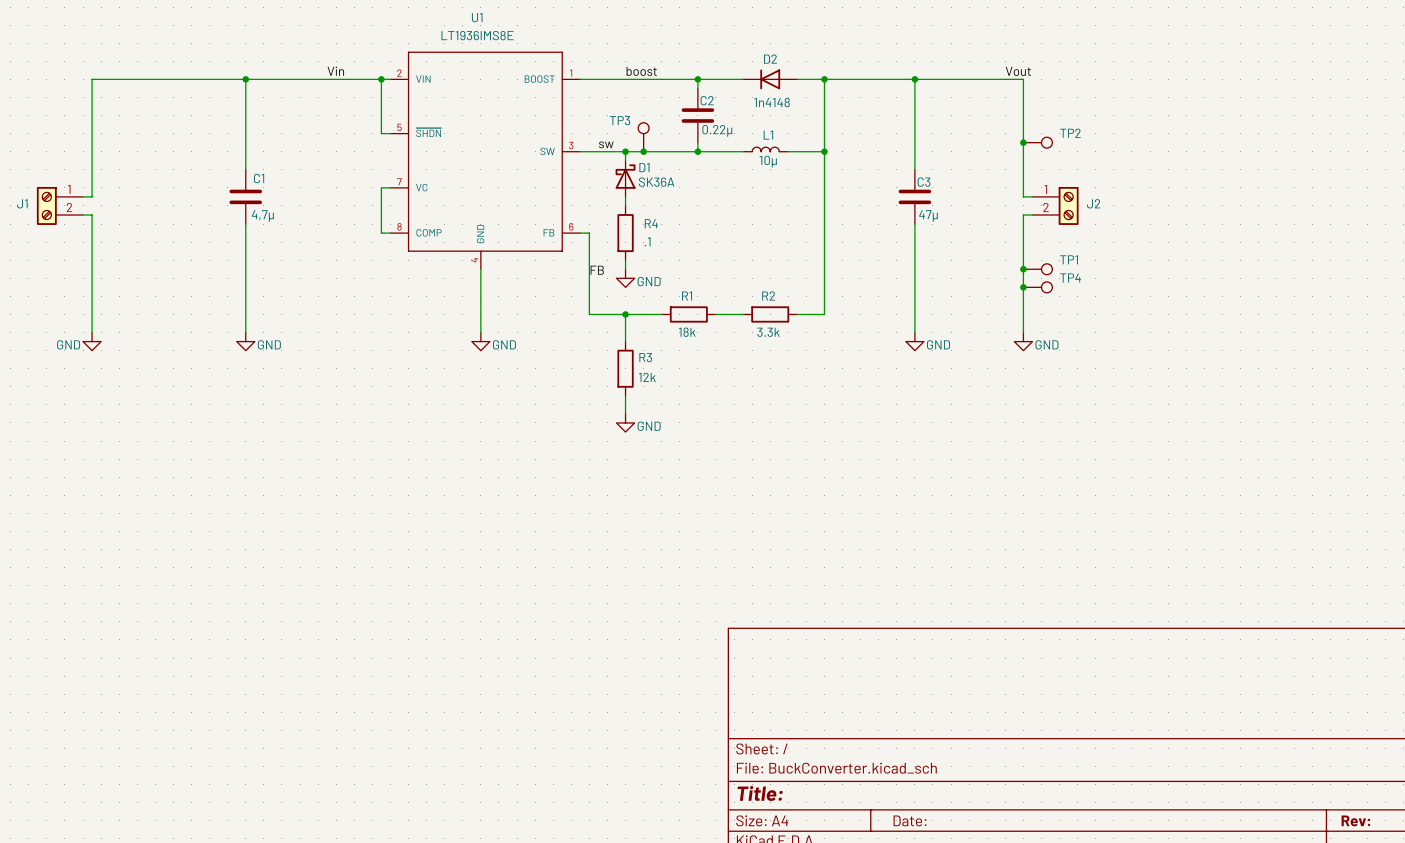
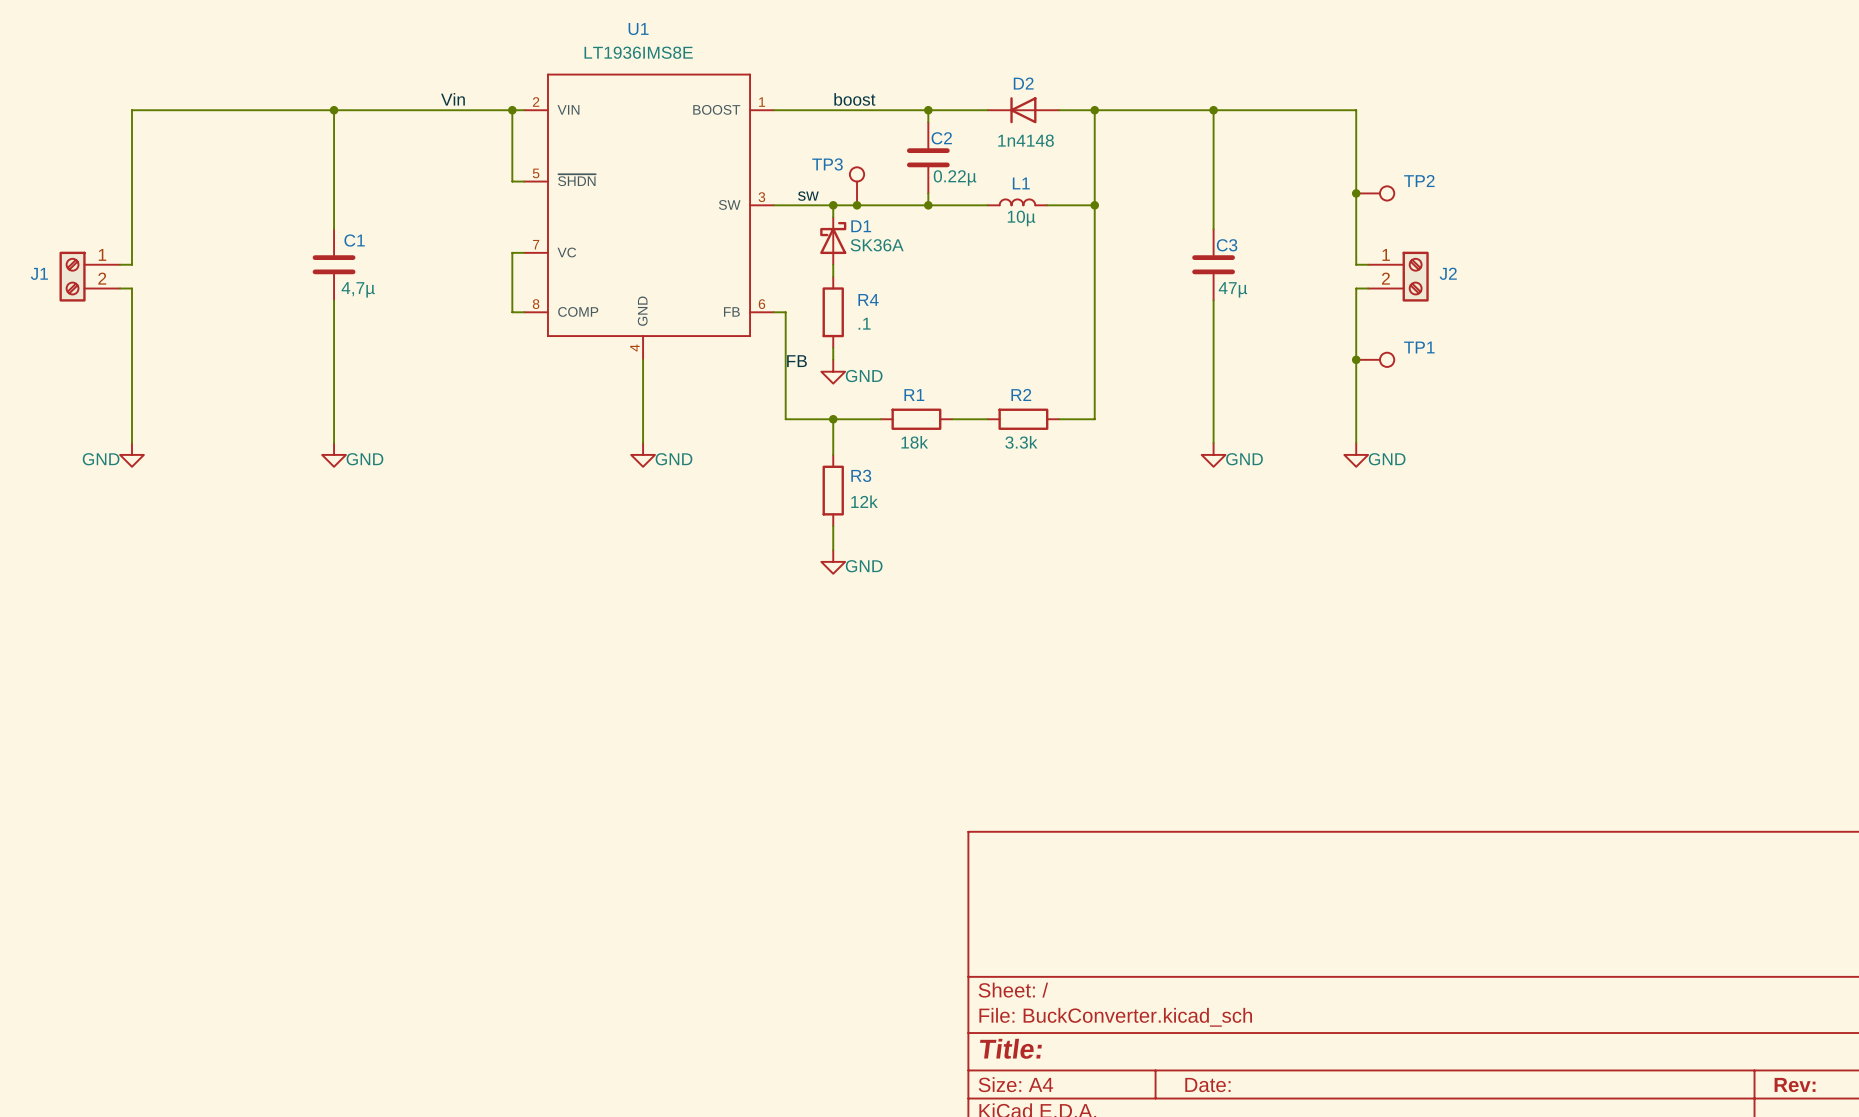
label: Vout (1018, 71) -> none
junction: (1023, 287) -> none
TP4: (1037, 287) -> none

